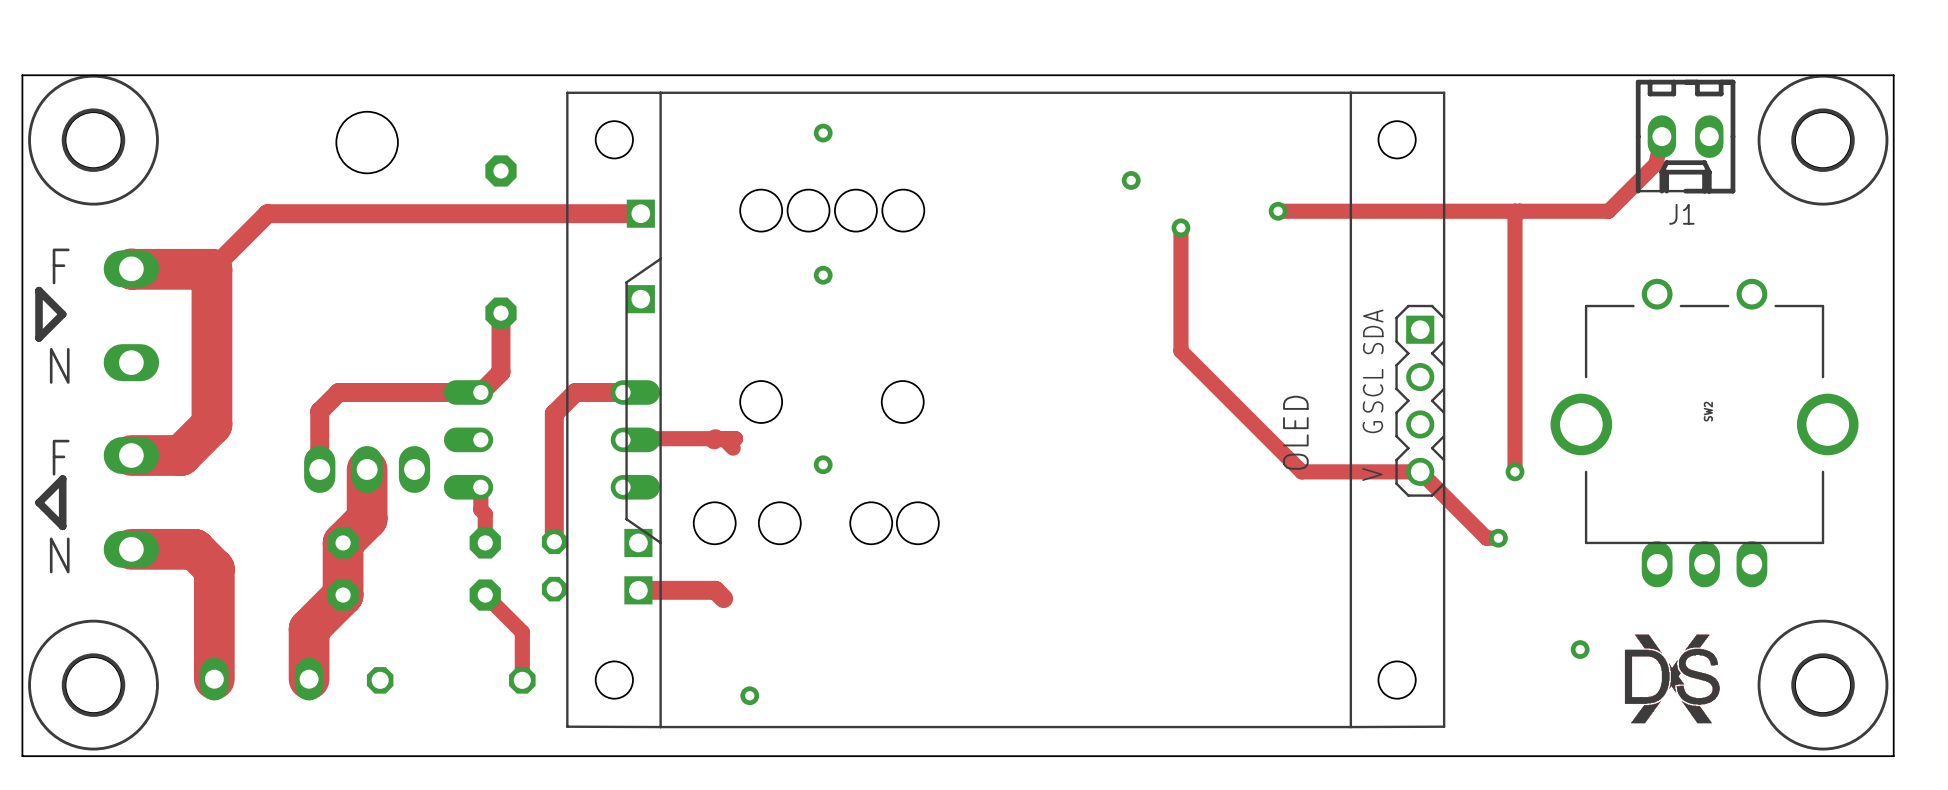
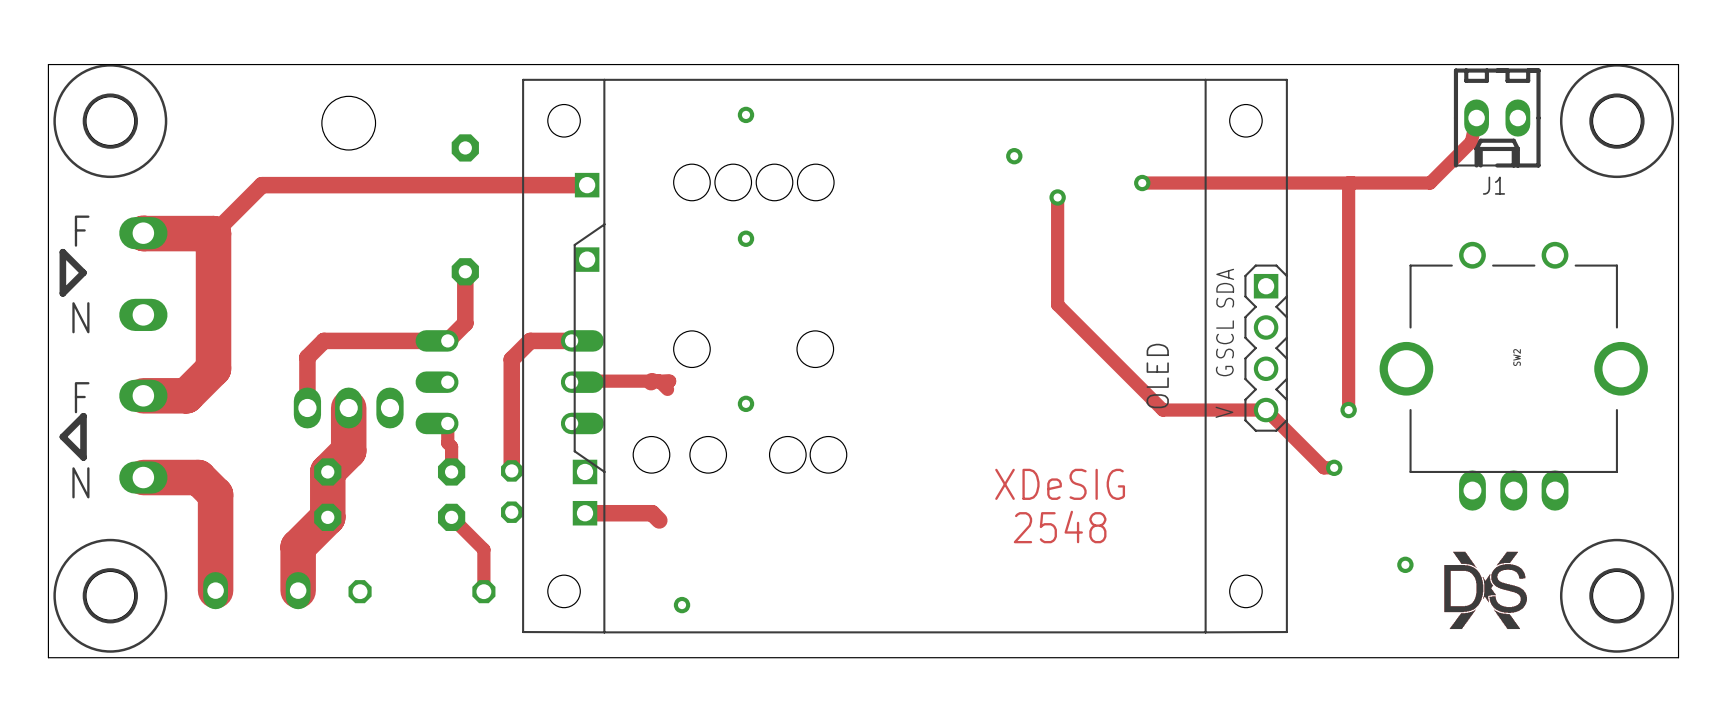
text: none -> XDeSIG (1060, 484)
text: none -> 2548 (1060, 527)

